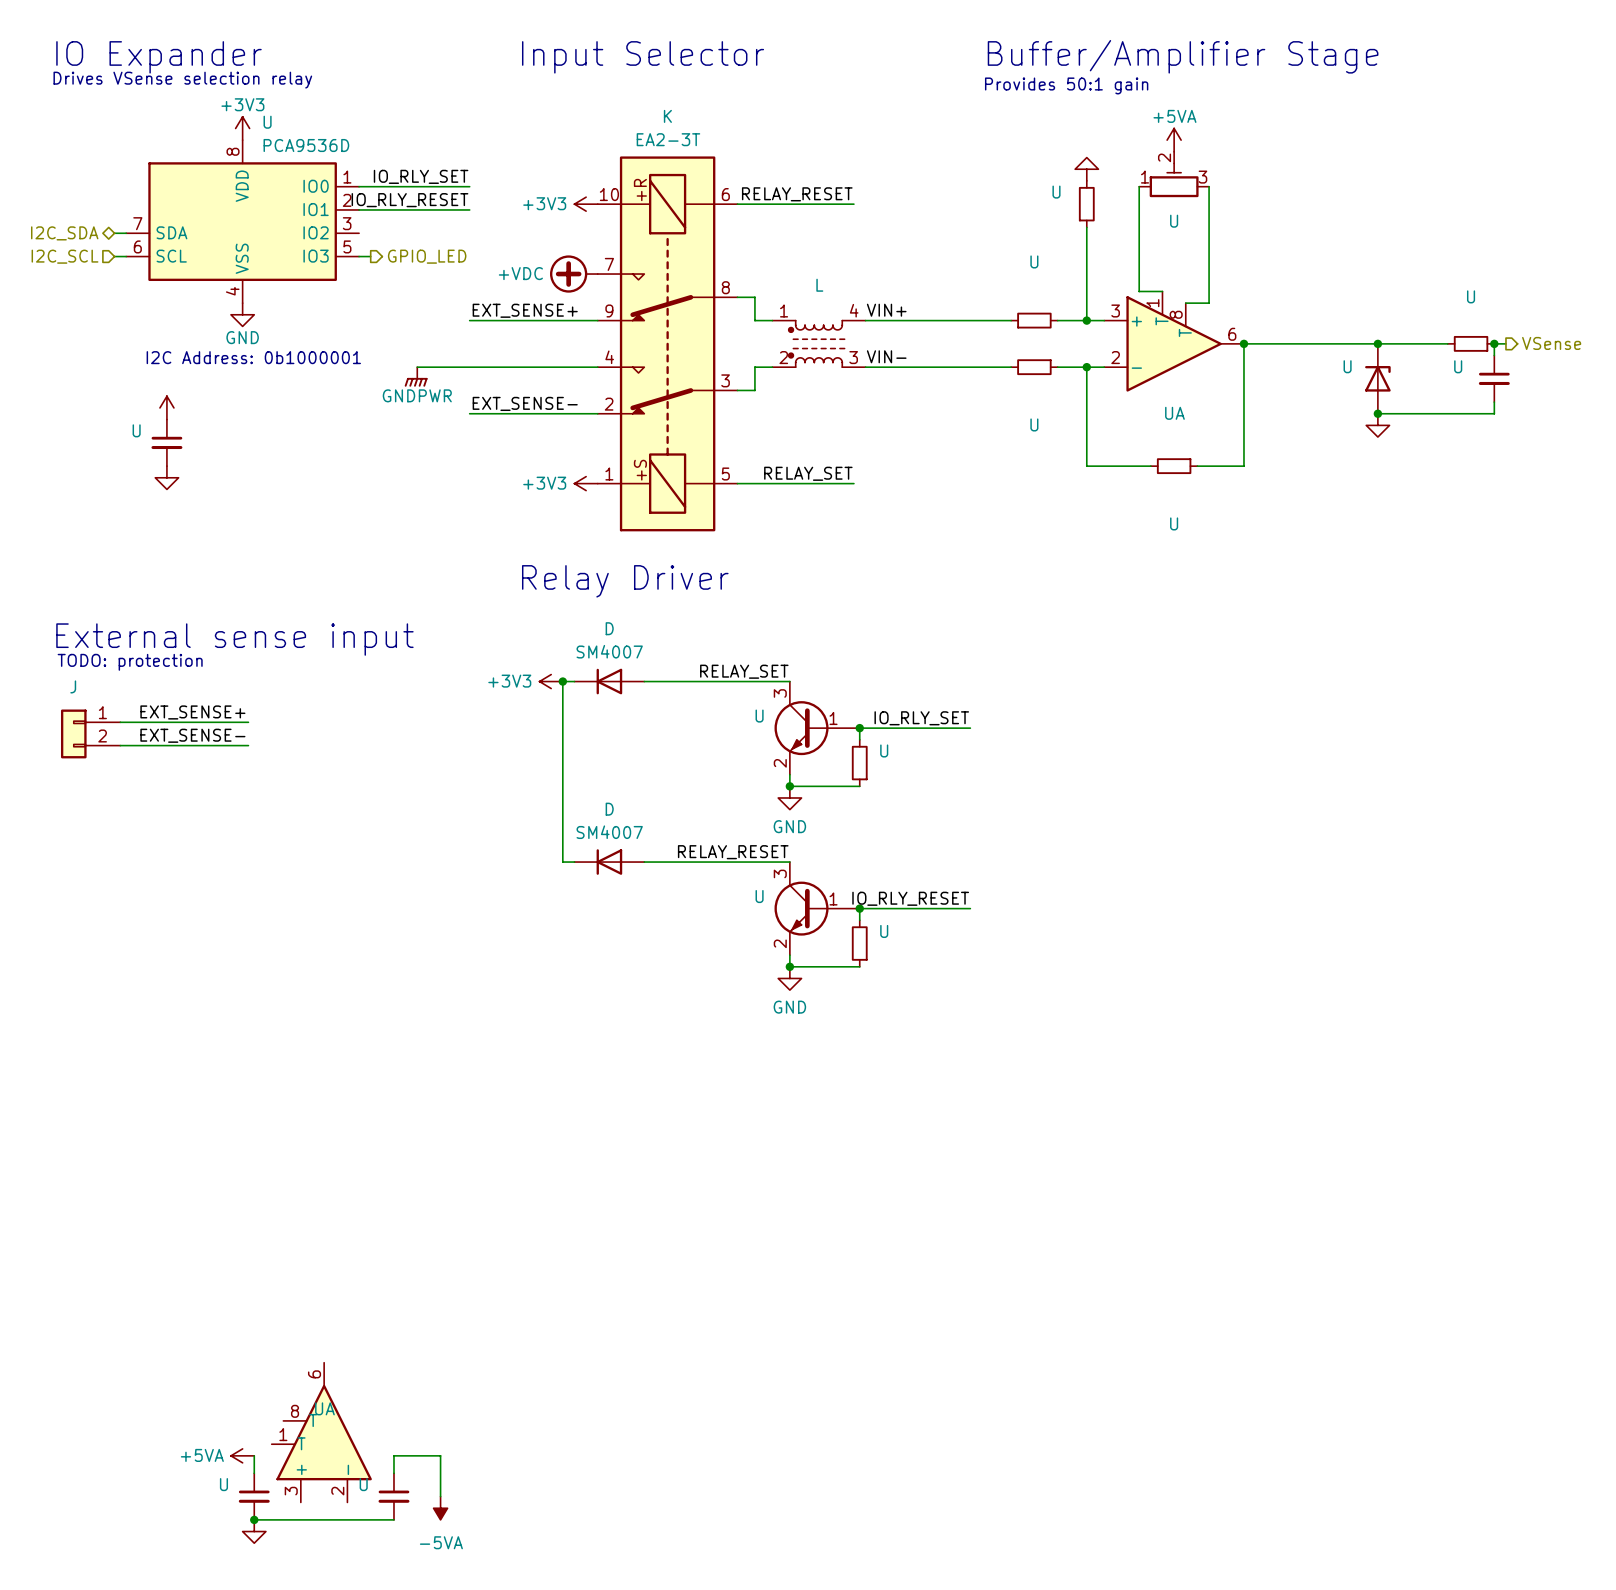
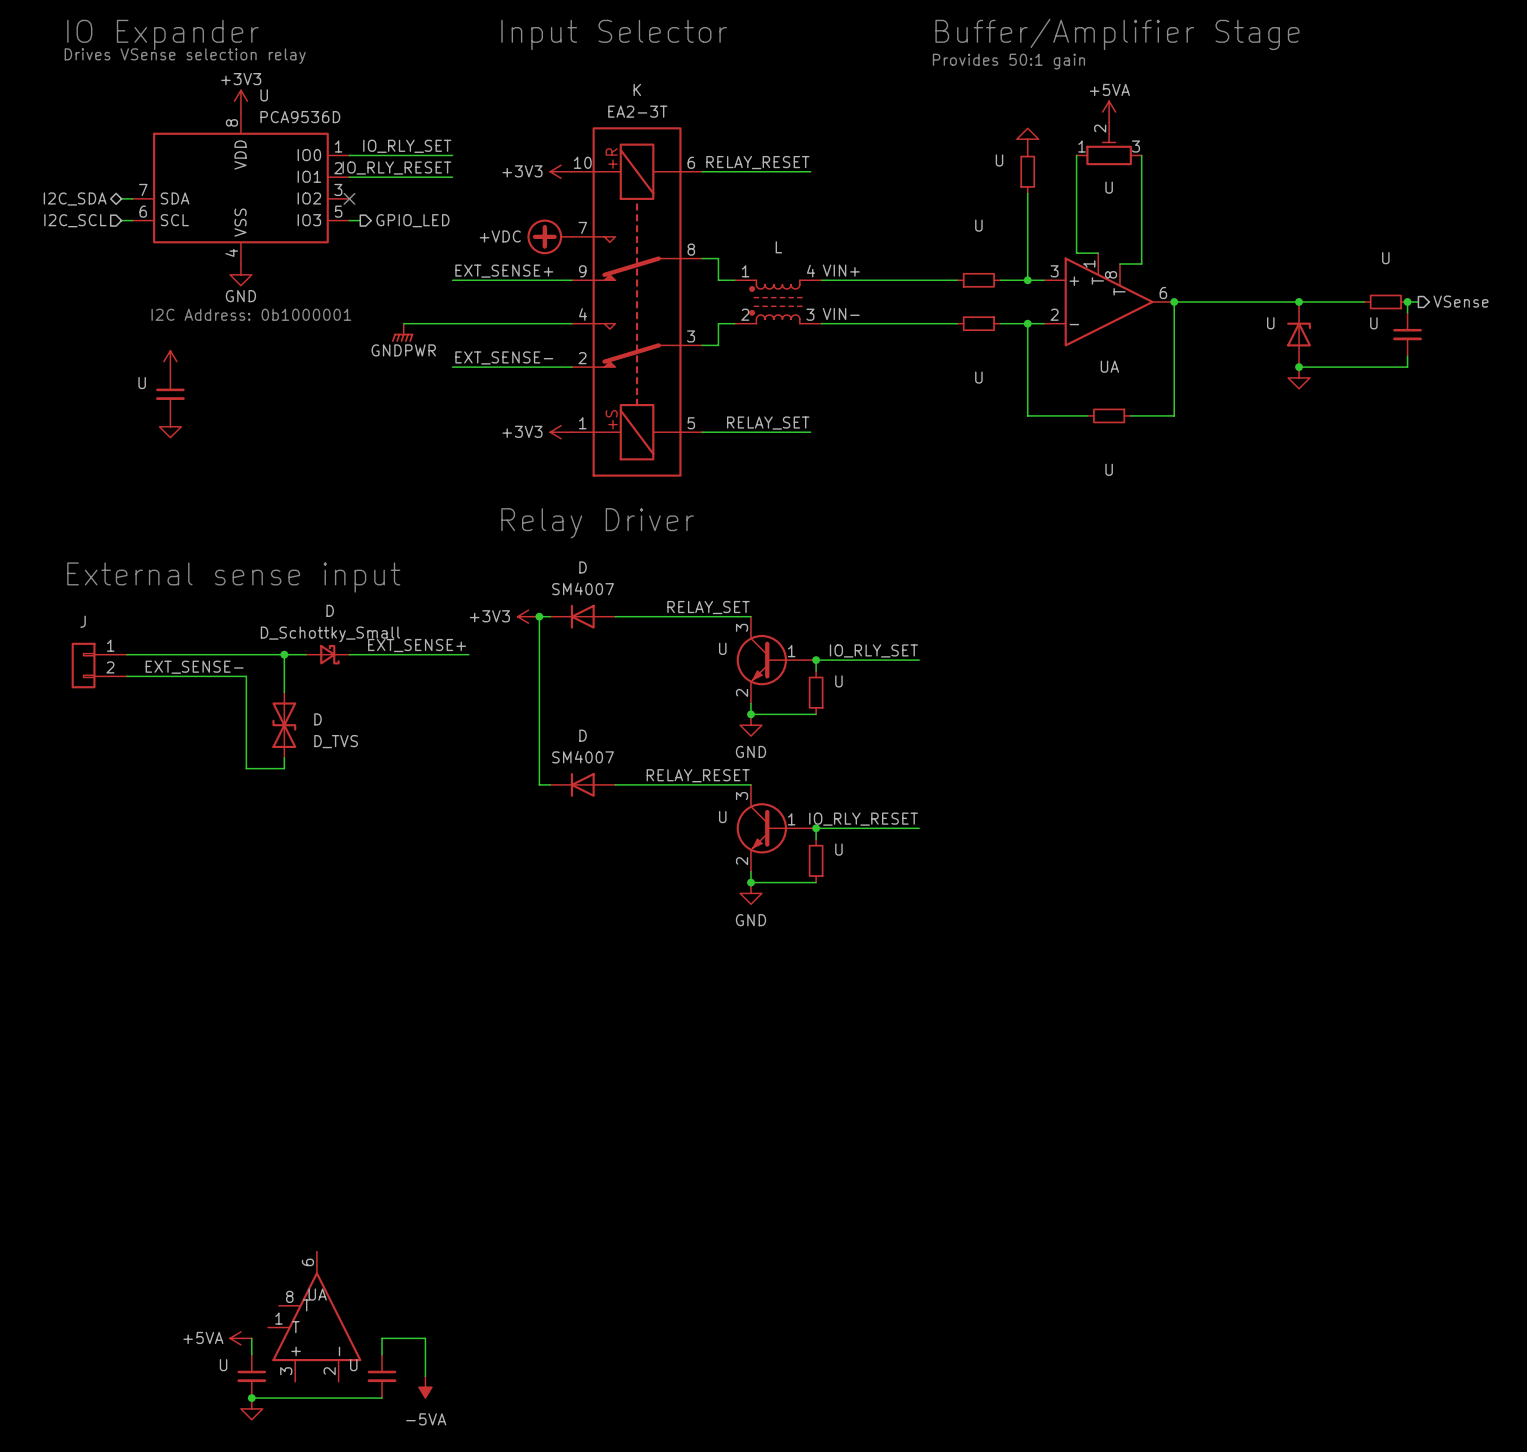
no-connect mark: none -> (349, 198)
text: TODO: protection (130, 662) -> none
label: EXT_SENSE+ (192, 712) -> none
label: none -> EXT_SENSE+ (417, 645)
wire: none -> (246, 654) (306, 654)
wire: none -> (284, 654) (284, 692)
junction: none -> (284, 654)
D: none -> D_Schottky_Small (327, 654)
wire: none -> (349, 654) (468, 654)
wire: none -> (246, 676) (246, 768) (284, 768) (284, 757)
D: none -> D_TVS (284, 725)

